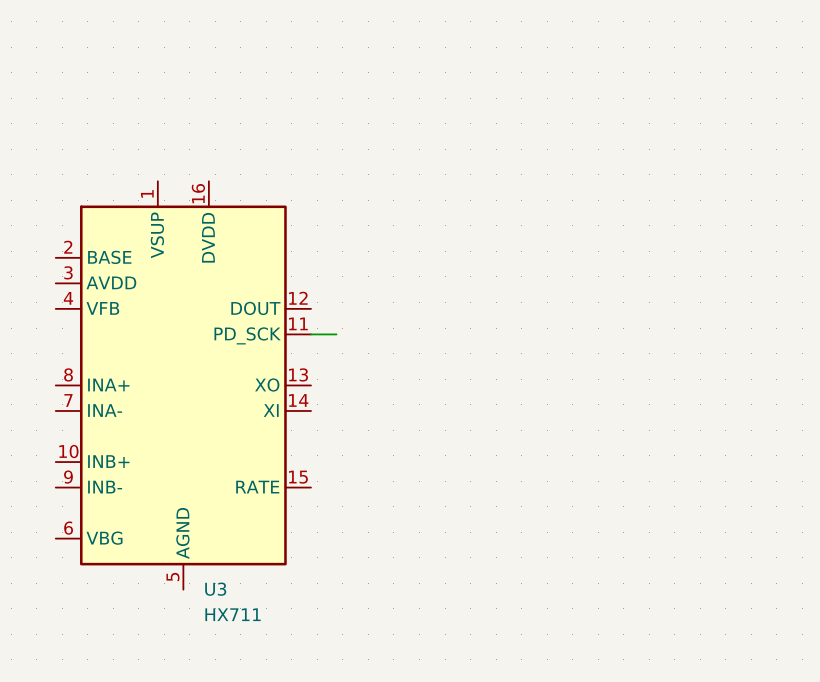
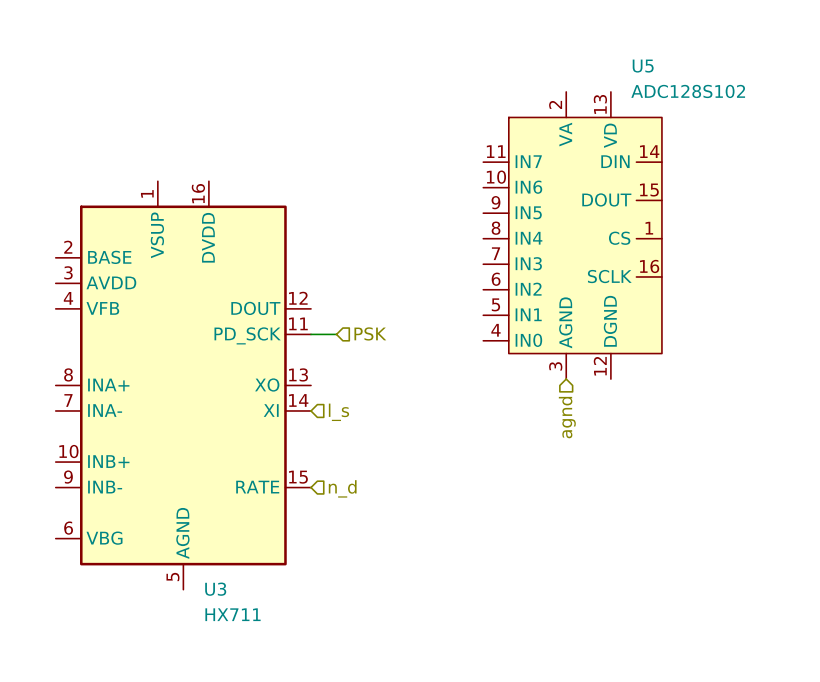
U5: none -> ADC128S102 (572, 235)
hierarchical label: none -> PSK (370, 333)
hierarchical label: none -> l_s (338, 412)
hierarchical label: none -> agnd (567, 417)
hierarchical label: none -> n_d (342, 488)

